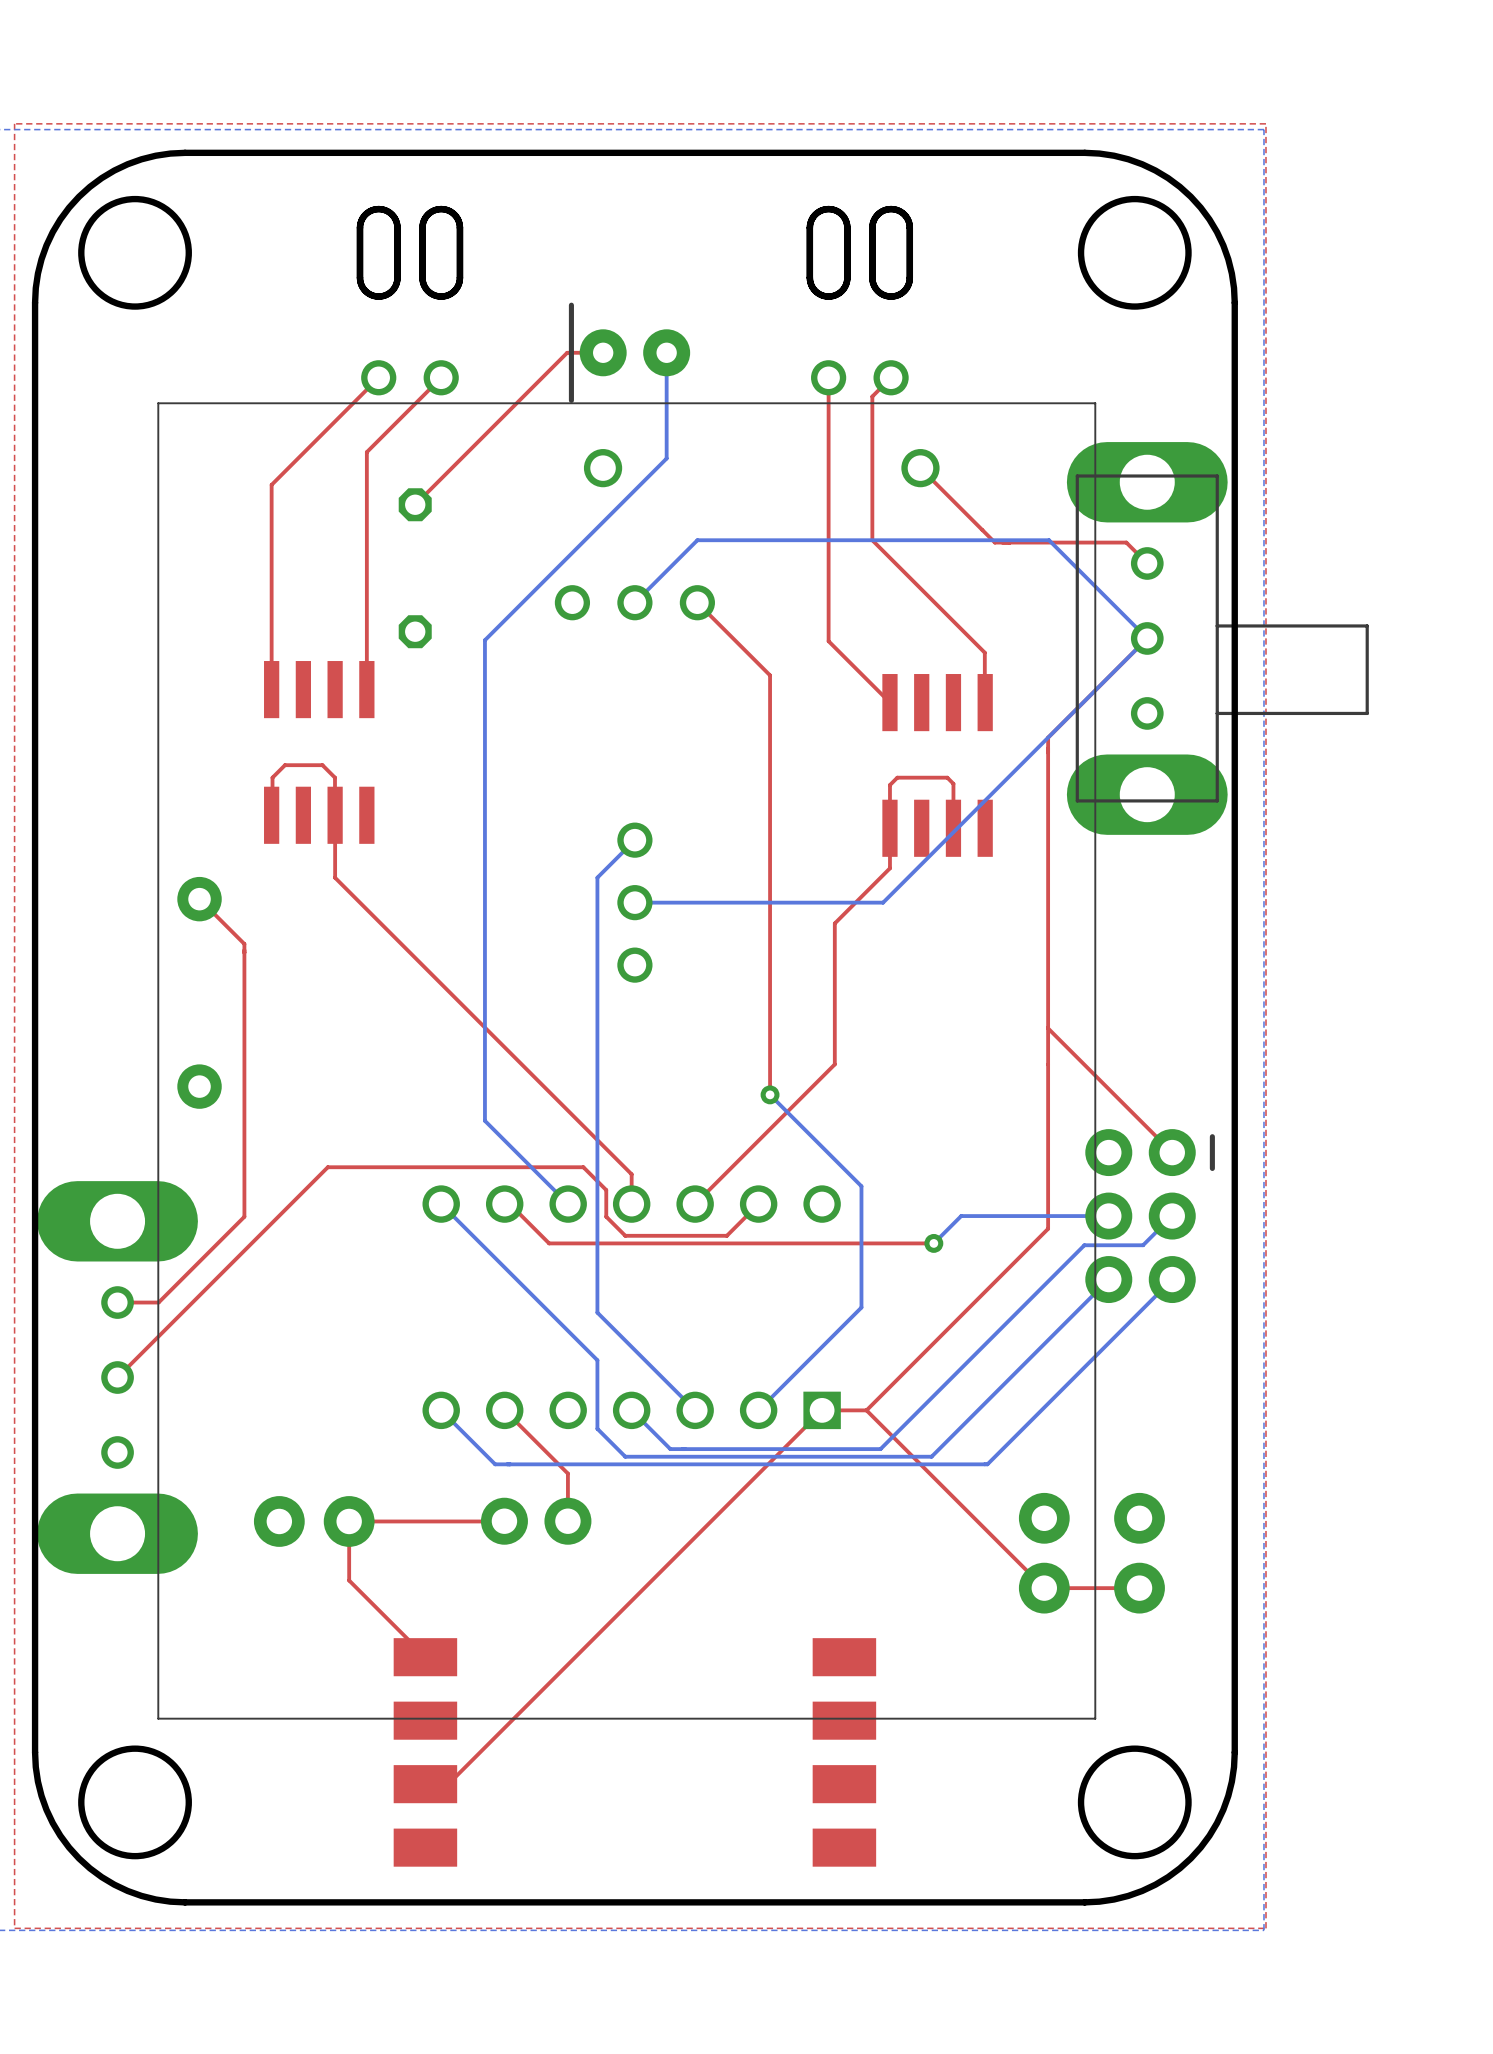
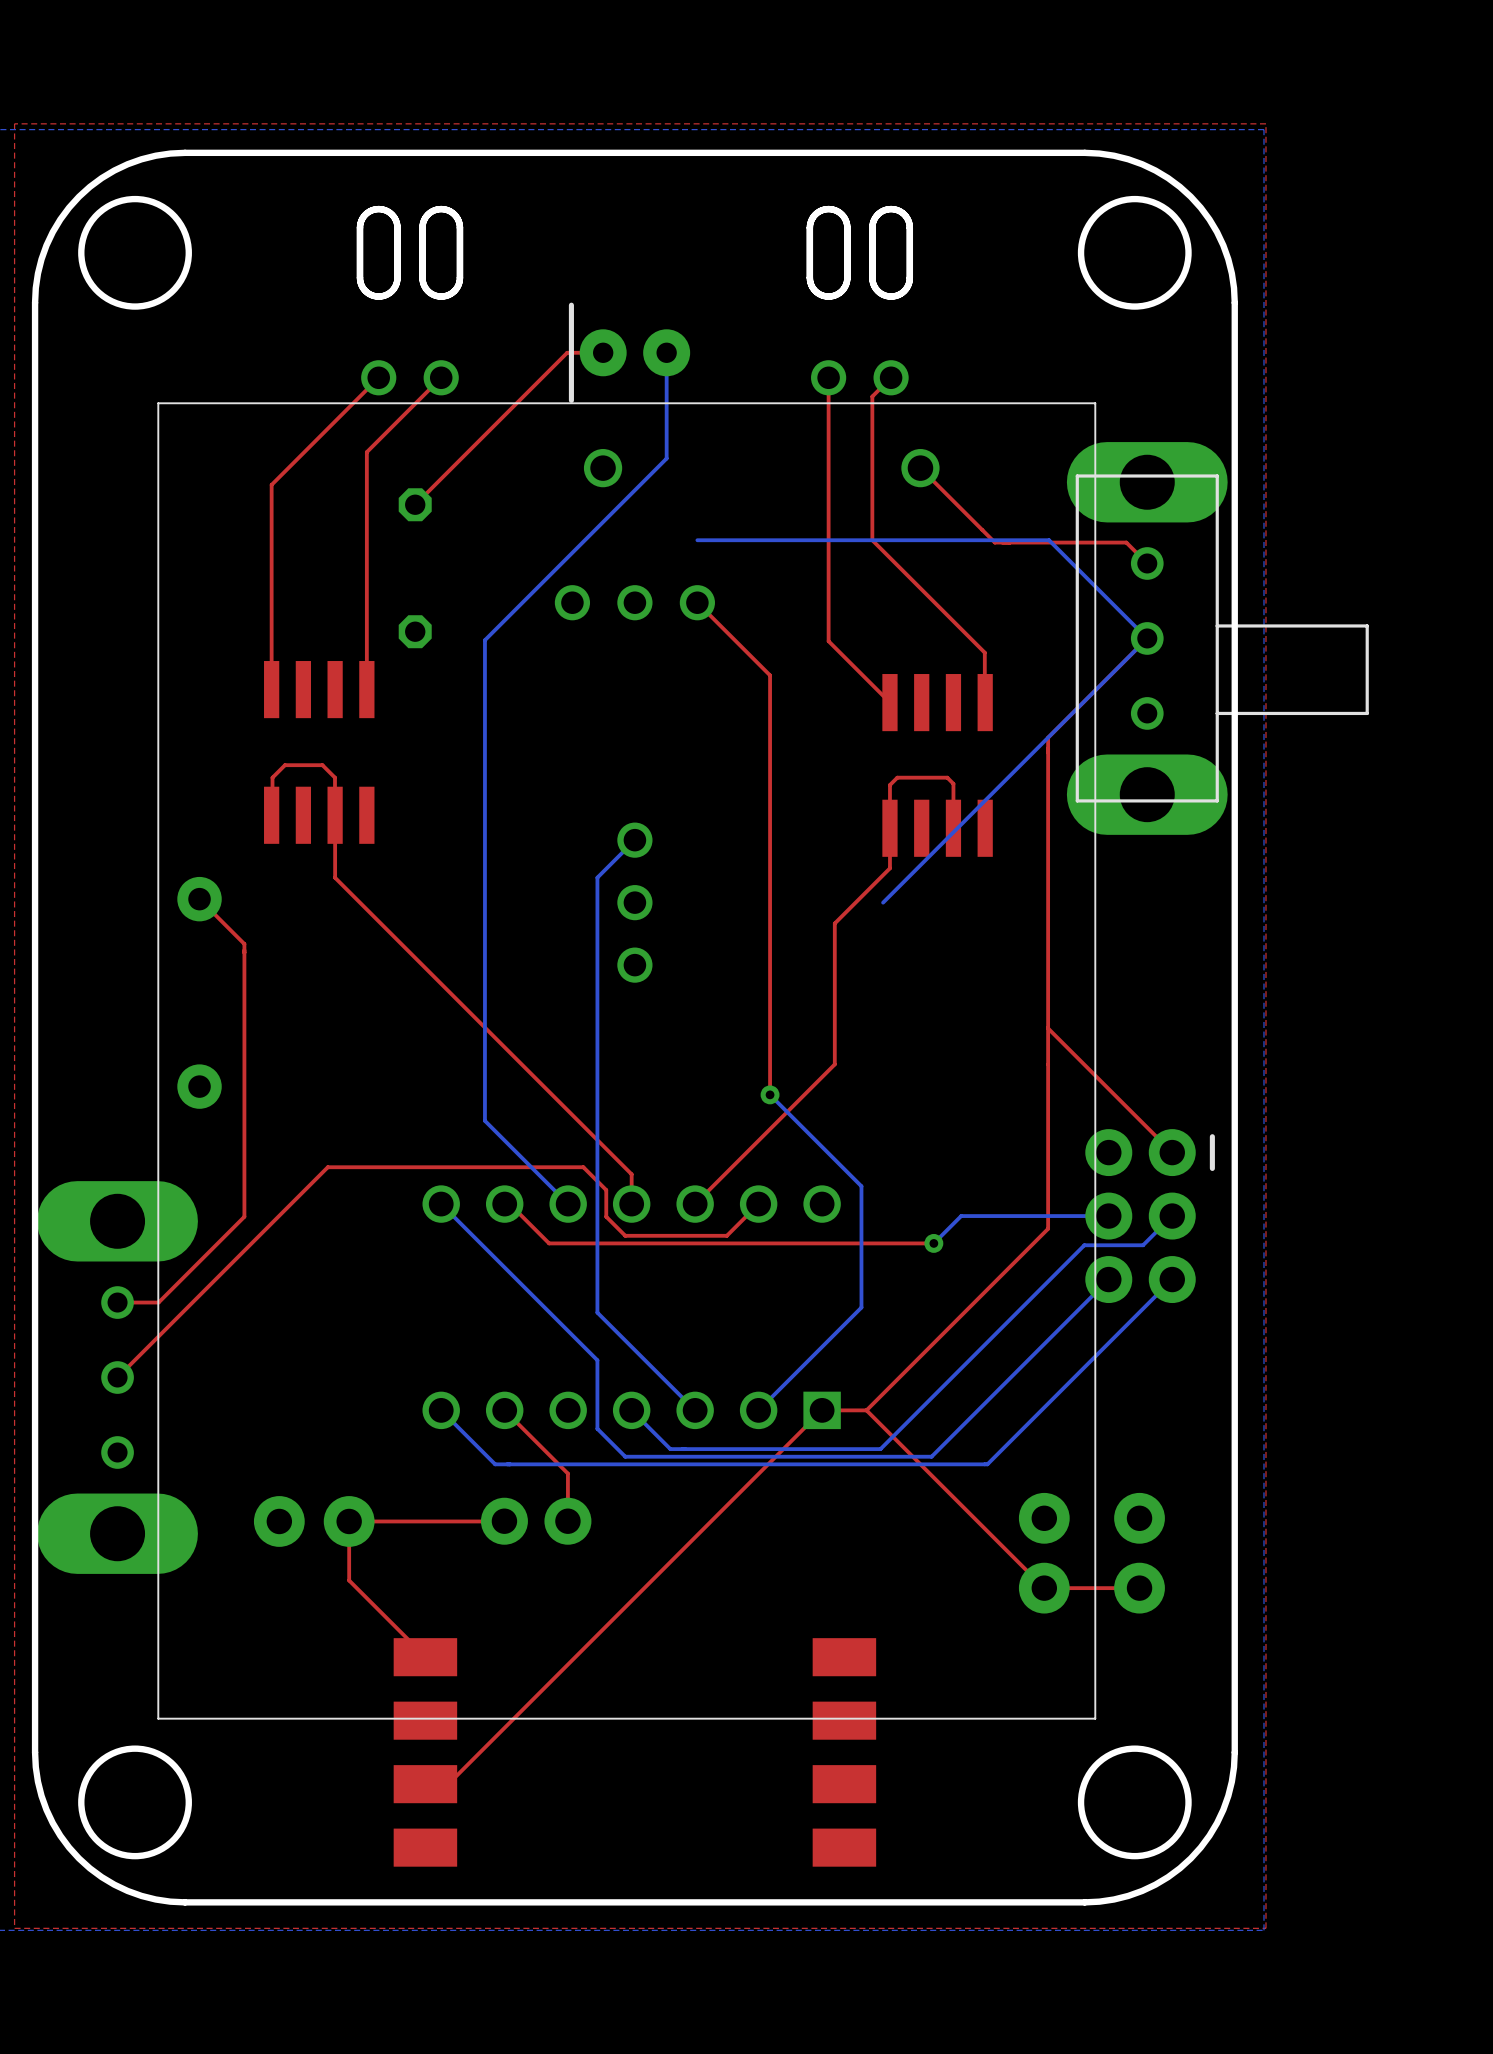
bottom track: (697, 540) (634, 602) -> none
bottom track: (883, 902) (634, 902) -> none

